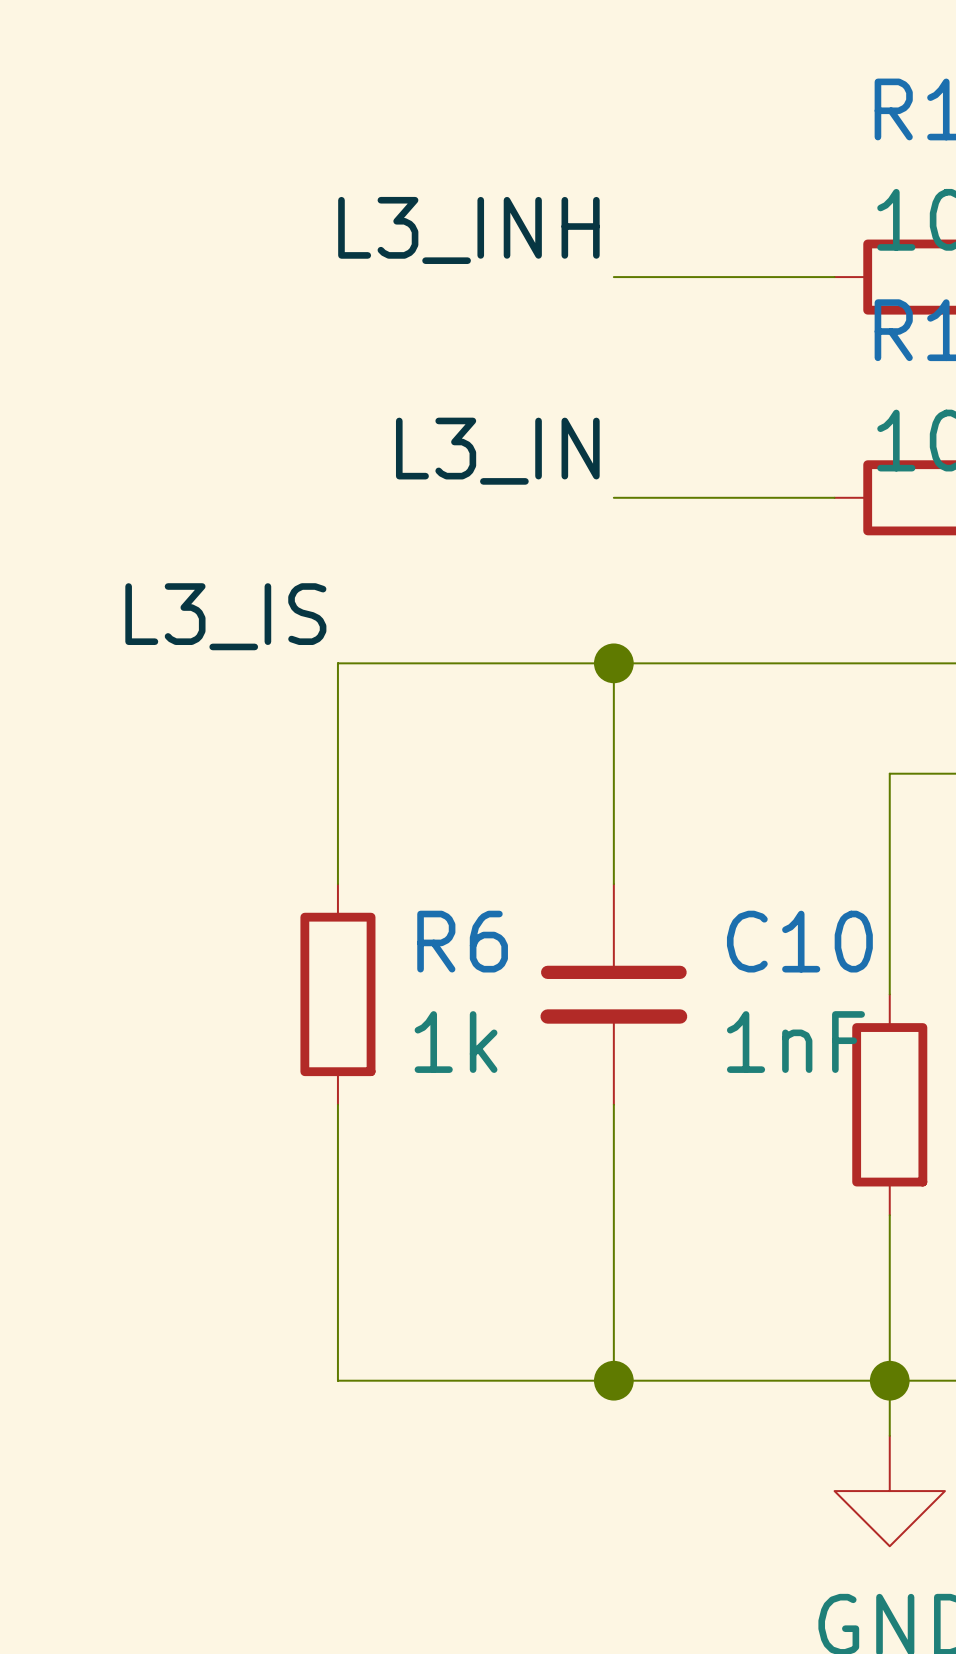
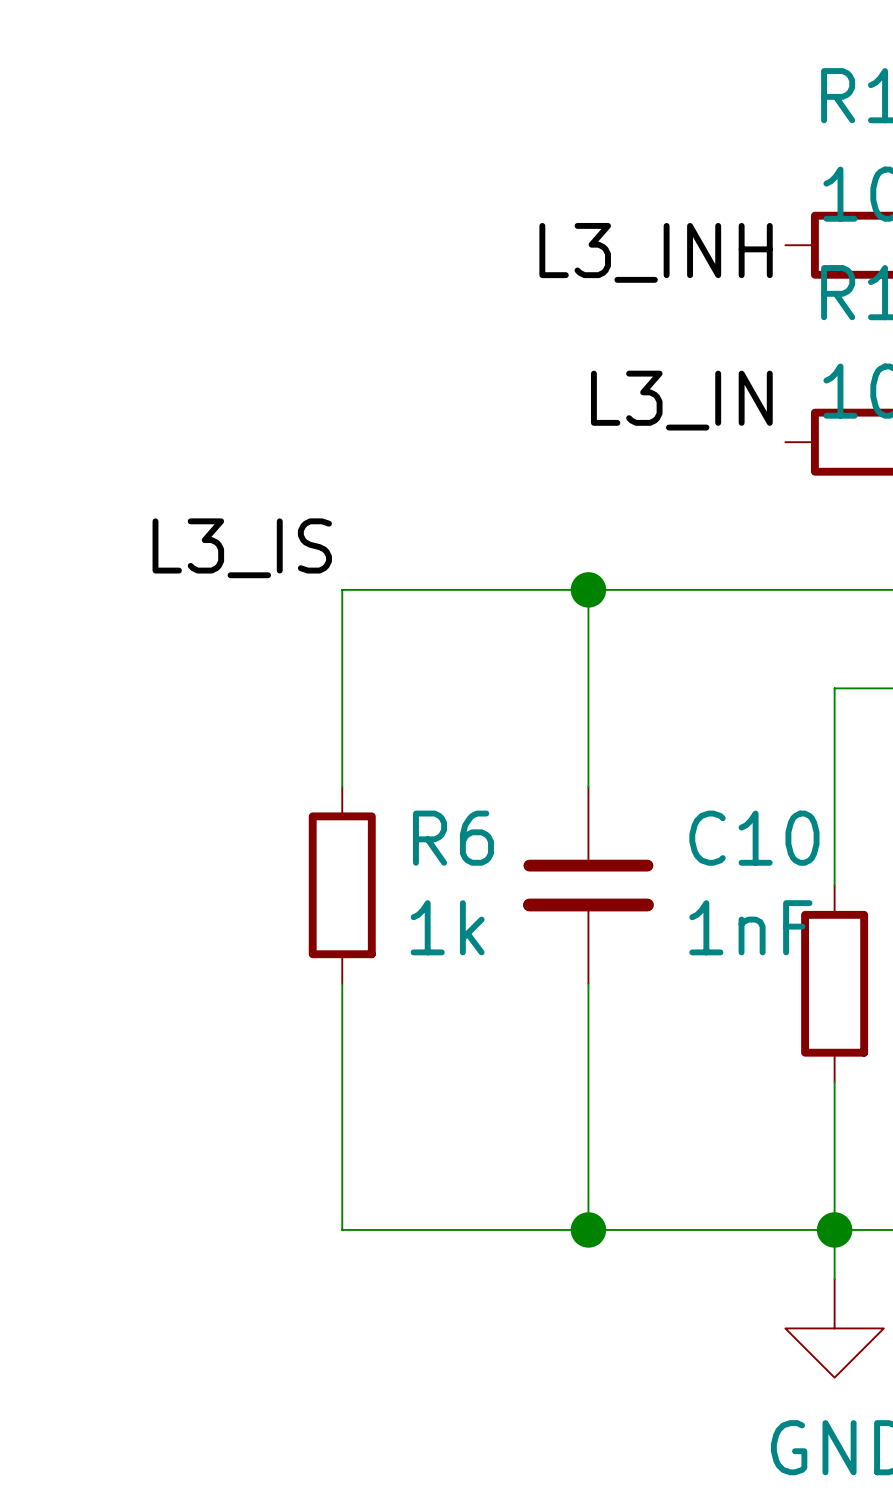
label position: L3_INH (468, 230) -> L3_INH (656, 252)
wire: (613, 277) (834, 277) -> none
label position: L3_IN (497, 451) -> L3_IN (681, 400)
wire: (613, 497) (834, 497) -> none

